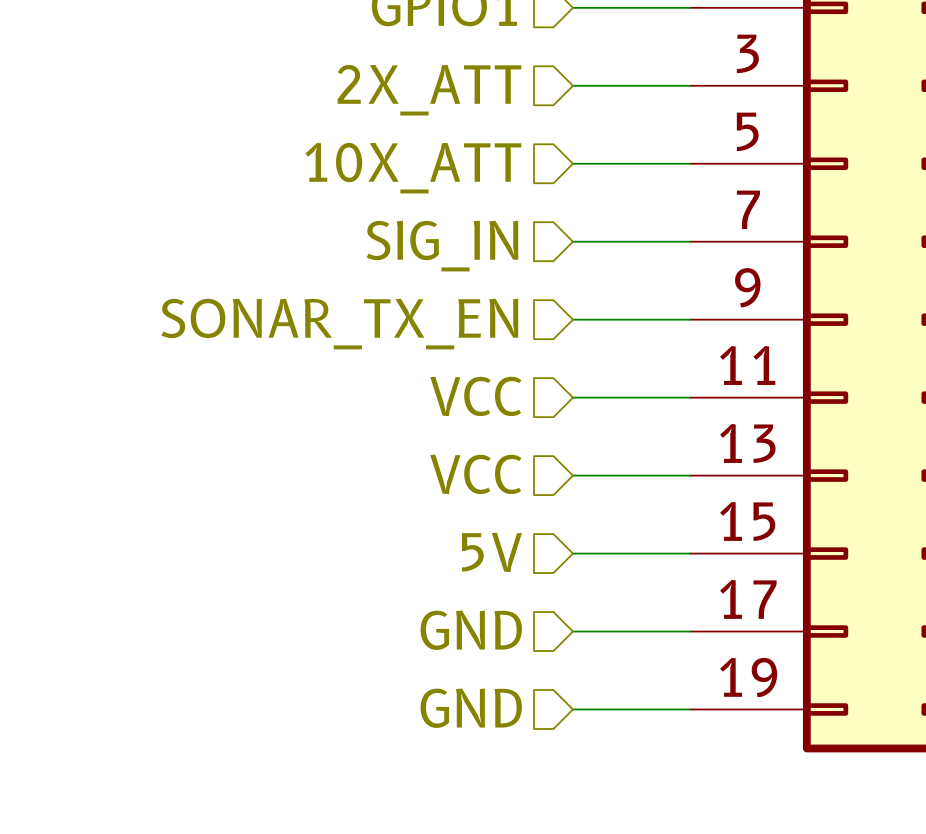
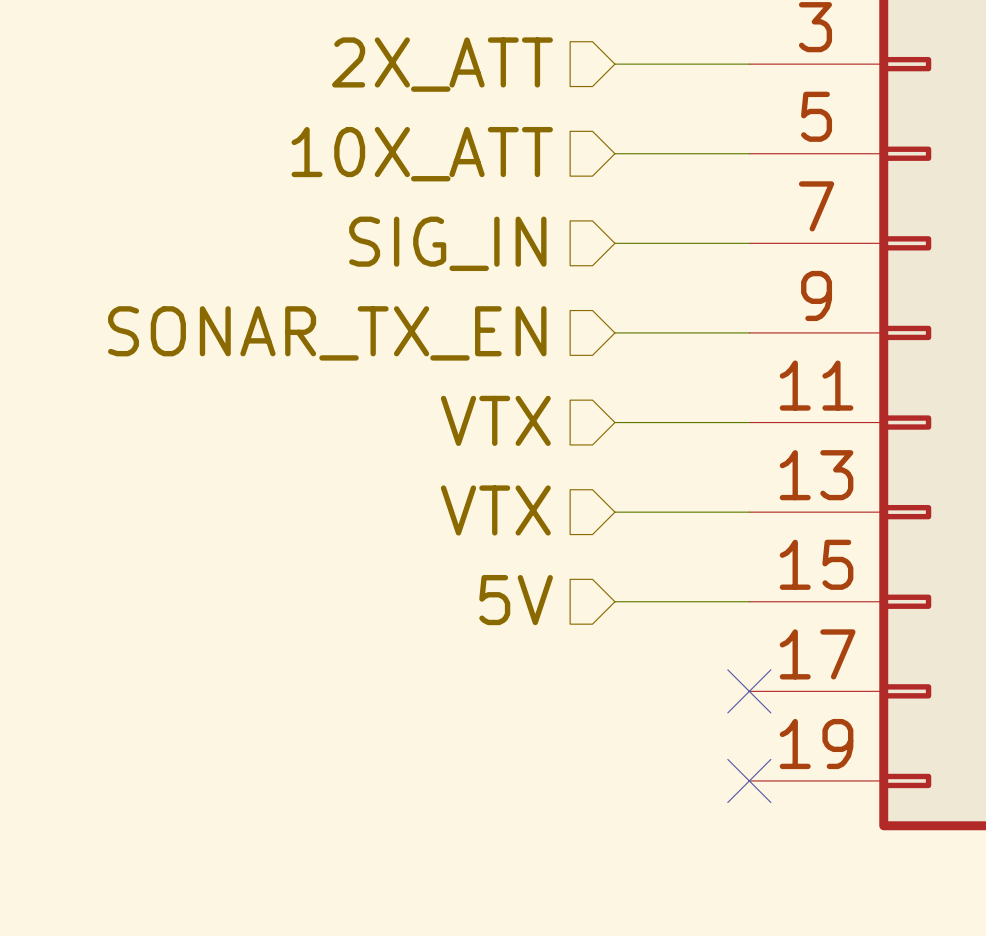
hierarchical label: VCC (475, 396) -> VTX (495, 420)
hierarchical label: VCC (475, 474) -> VTX (495, 510)
hierarchical label: GND (471, 630) -> none
wire: (572, 631) (689, 631) -> none
no-connect mark: none -> (749, 691)
hierarchical label: GND (471, 708) -> none
wire: (572, 709) (689, 709) -> none
no-connect mark: none -> (749, 780)

